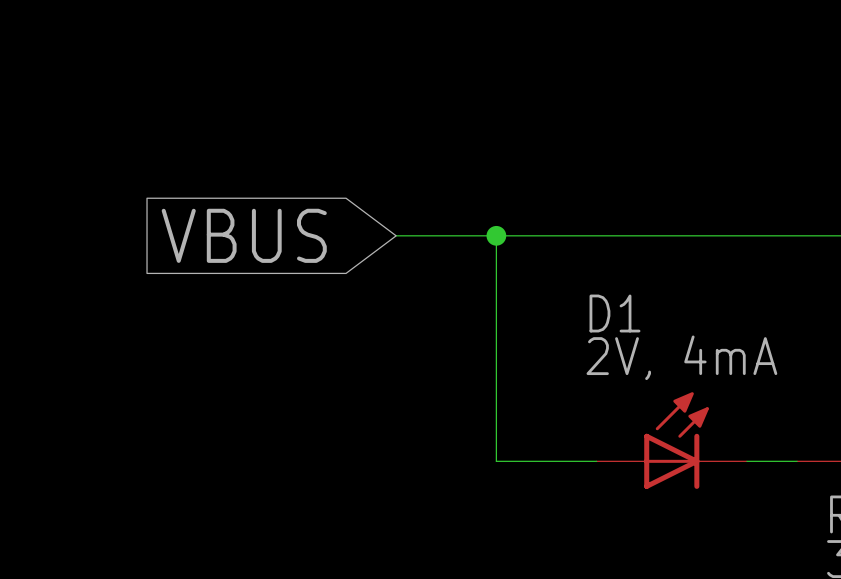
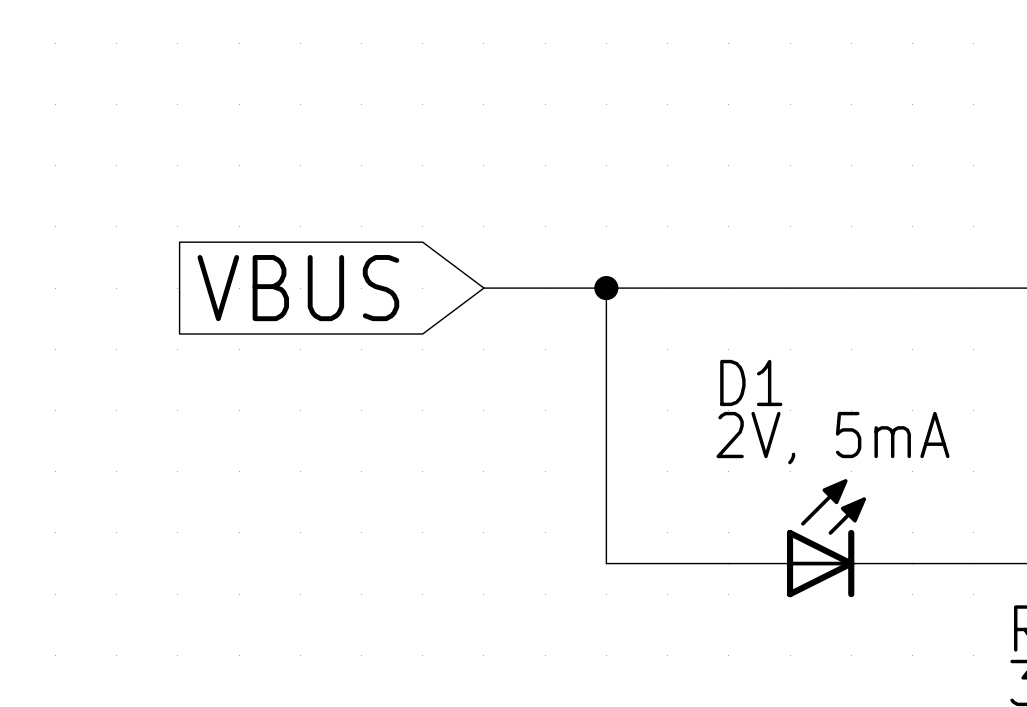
D1 value: 2V, 4mA (681, 357) -> 2V, 5mA (833, 438)

